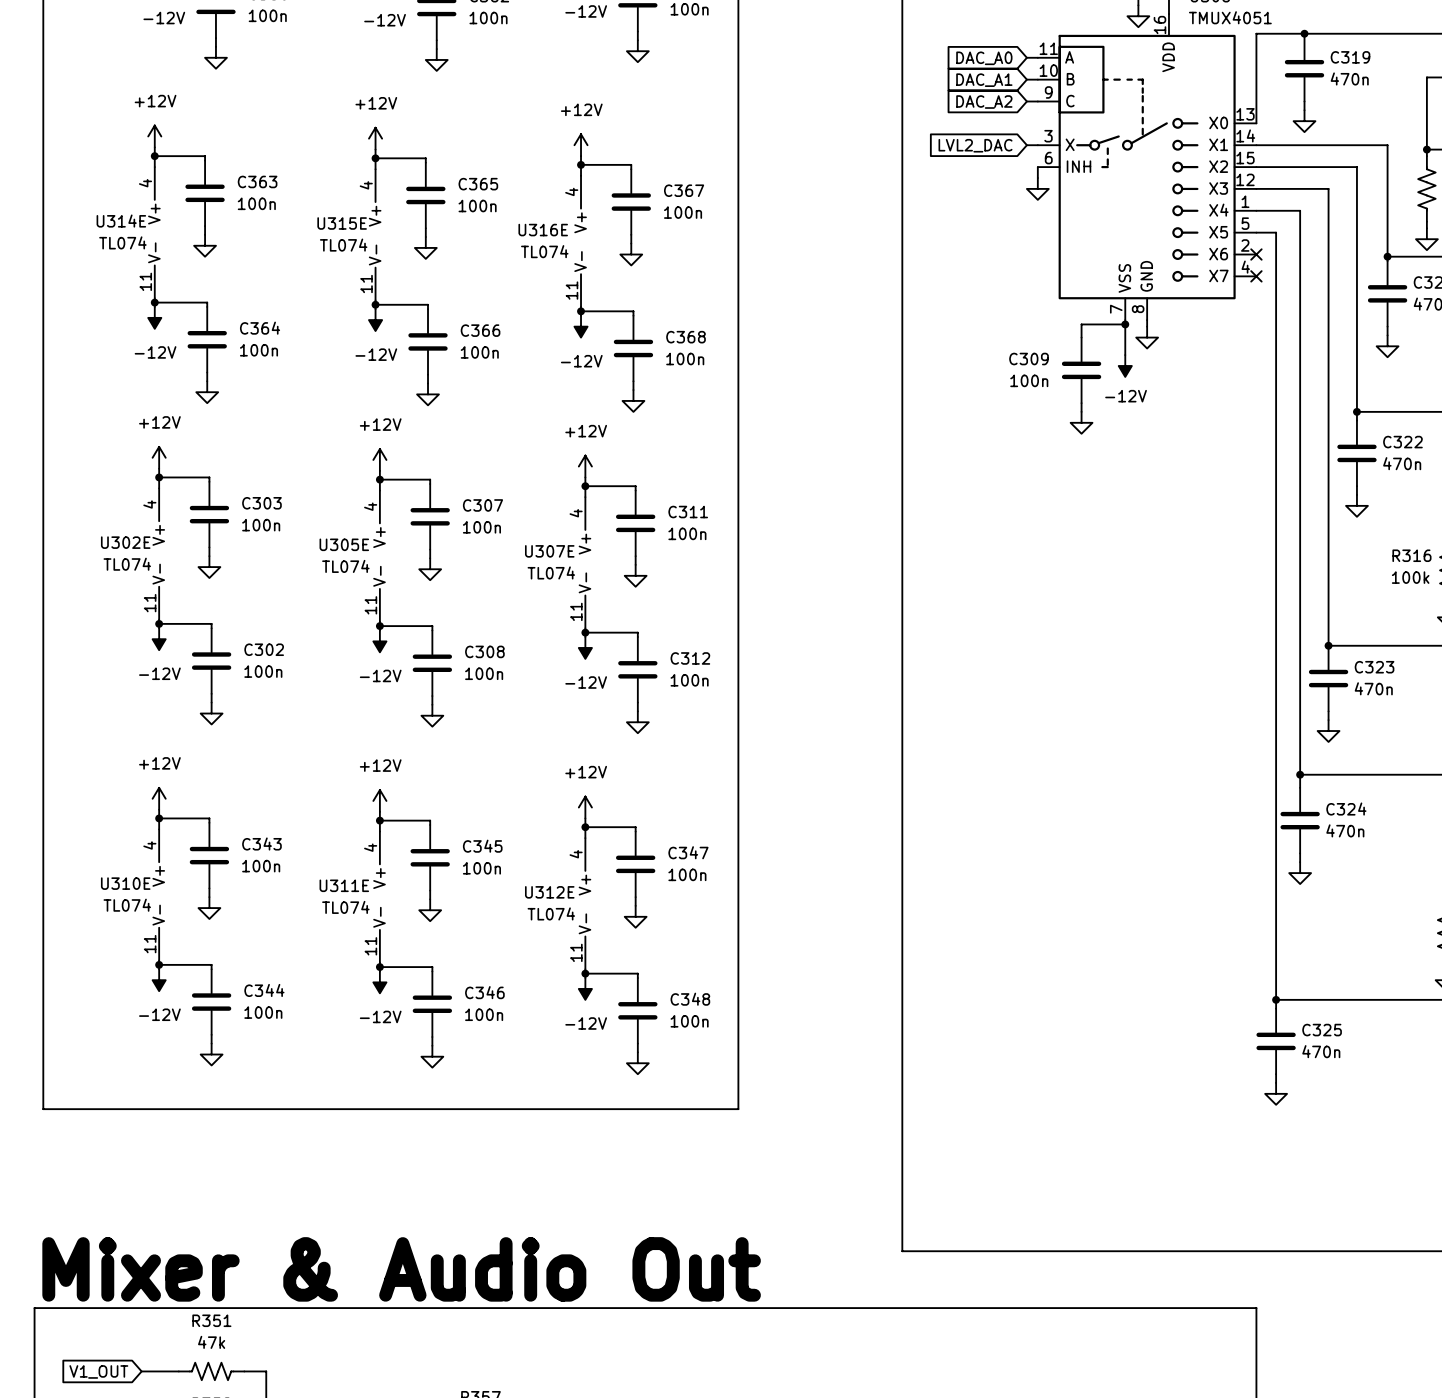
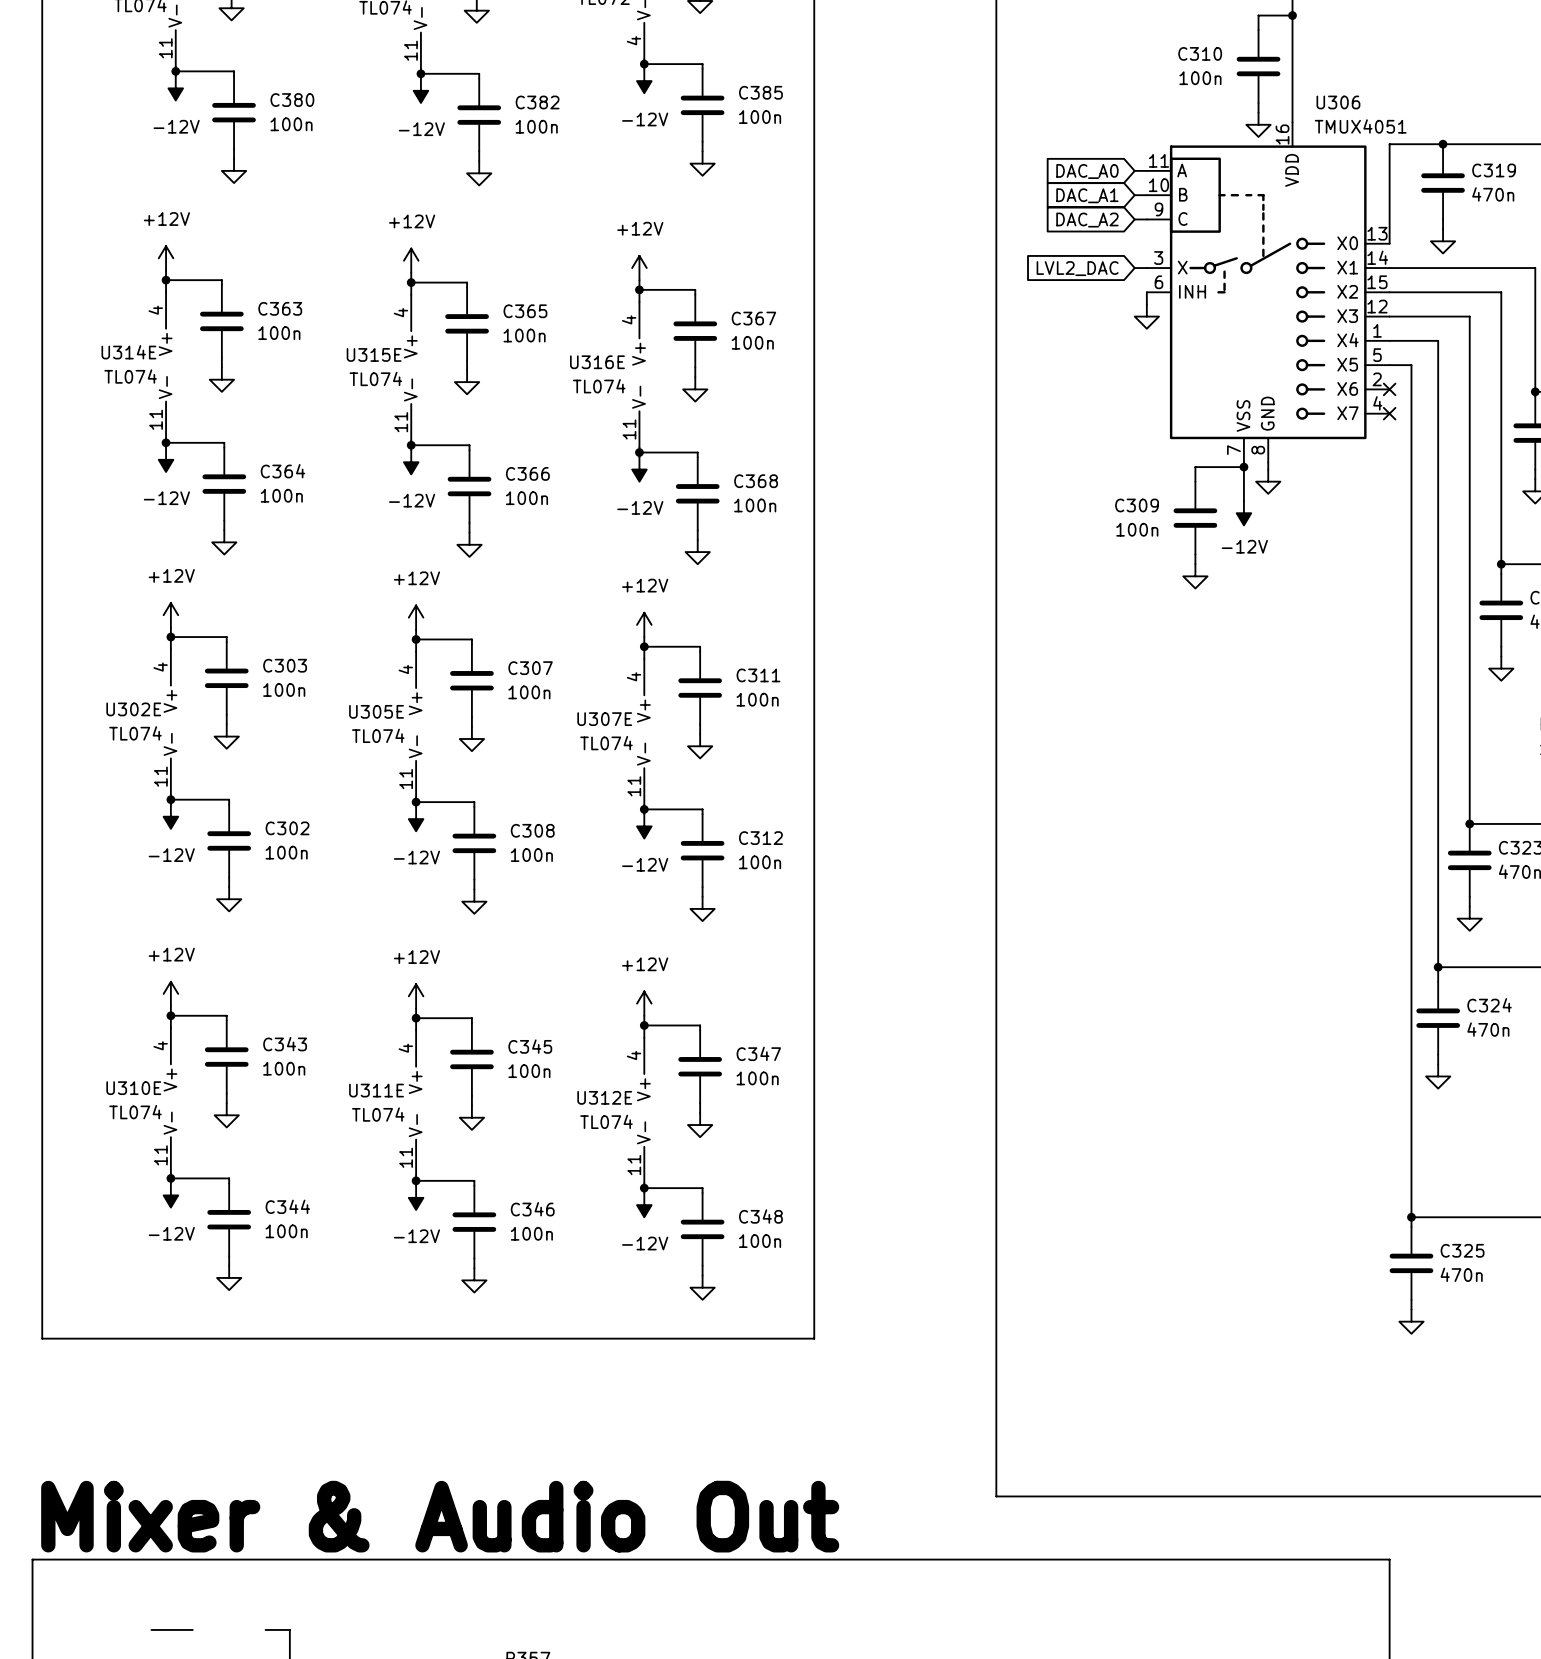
global label: V1_OUT (98, 1371) -> none
R351: 47k (211, 1371) -> none

